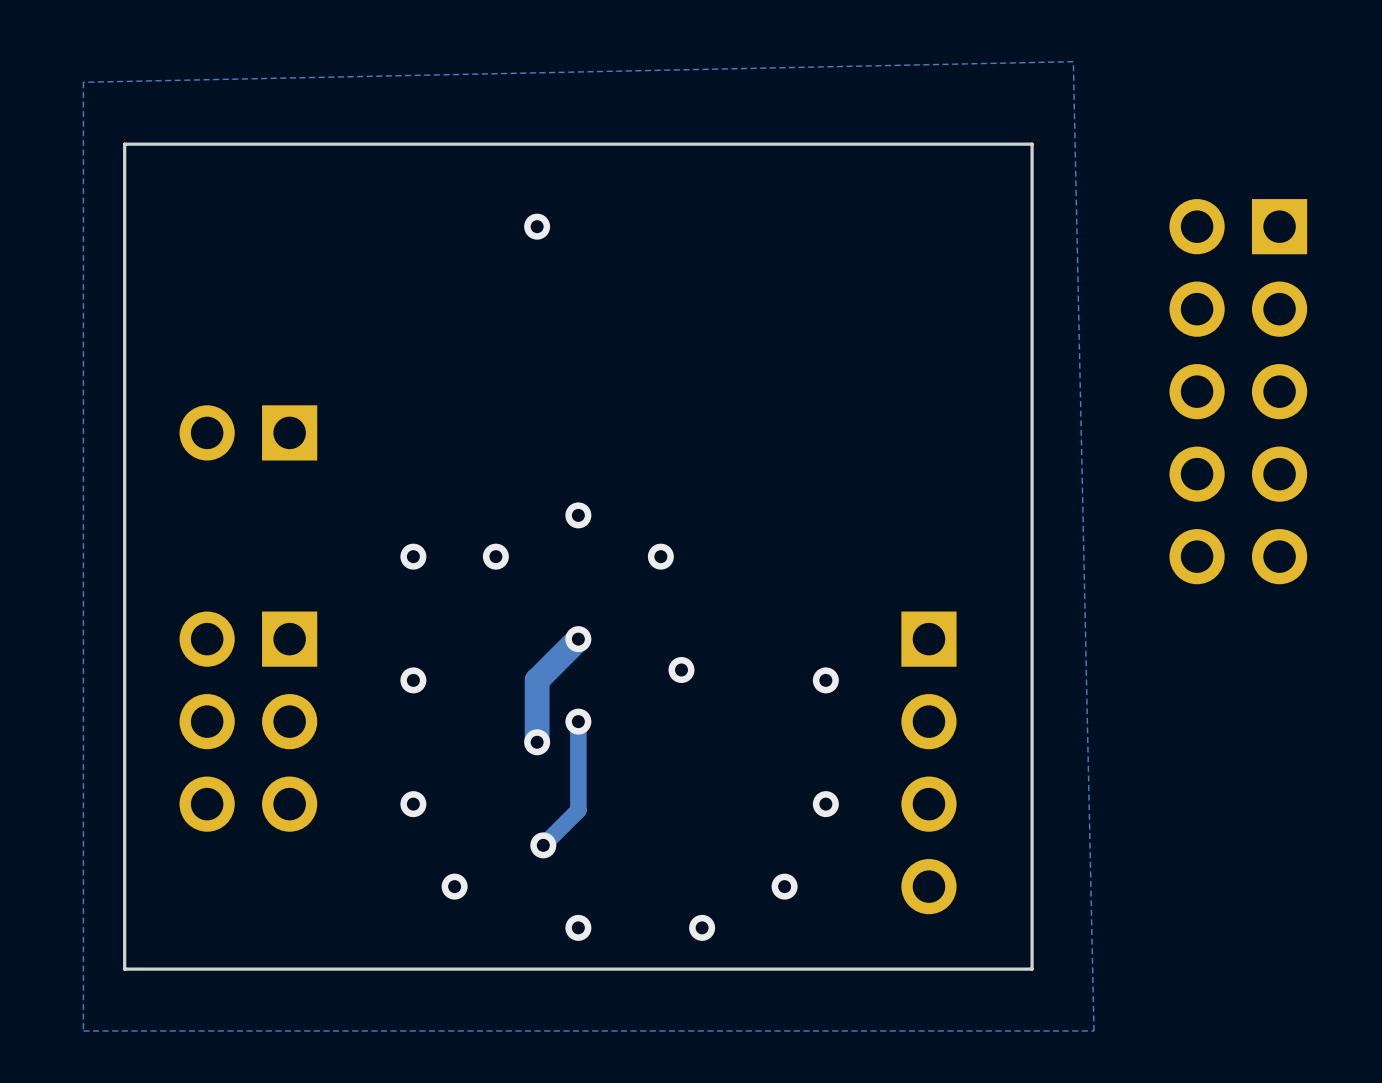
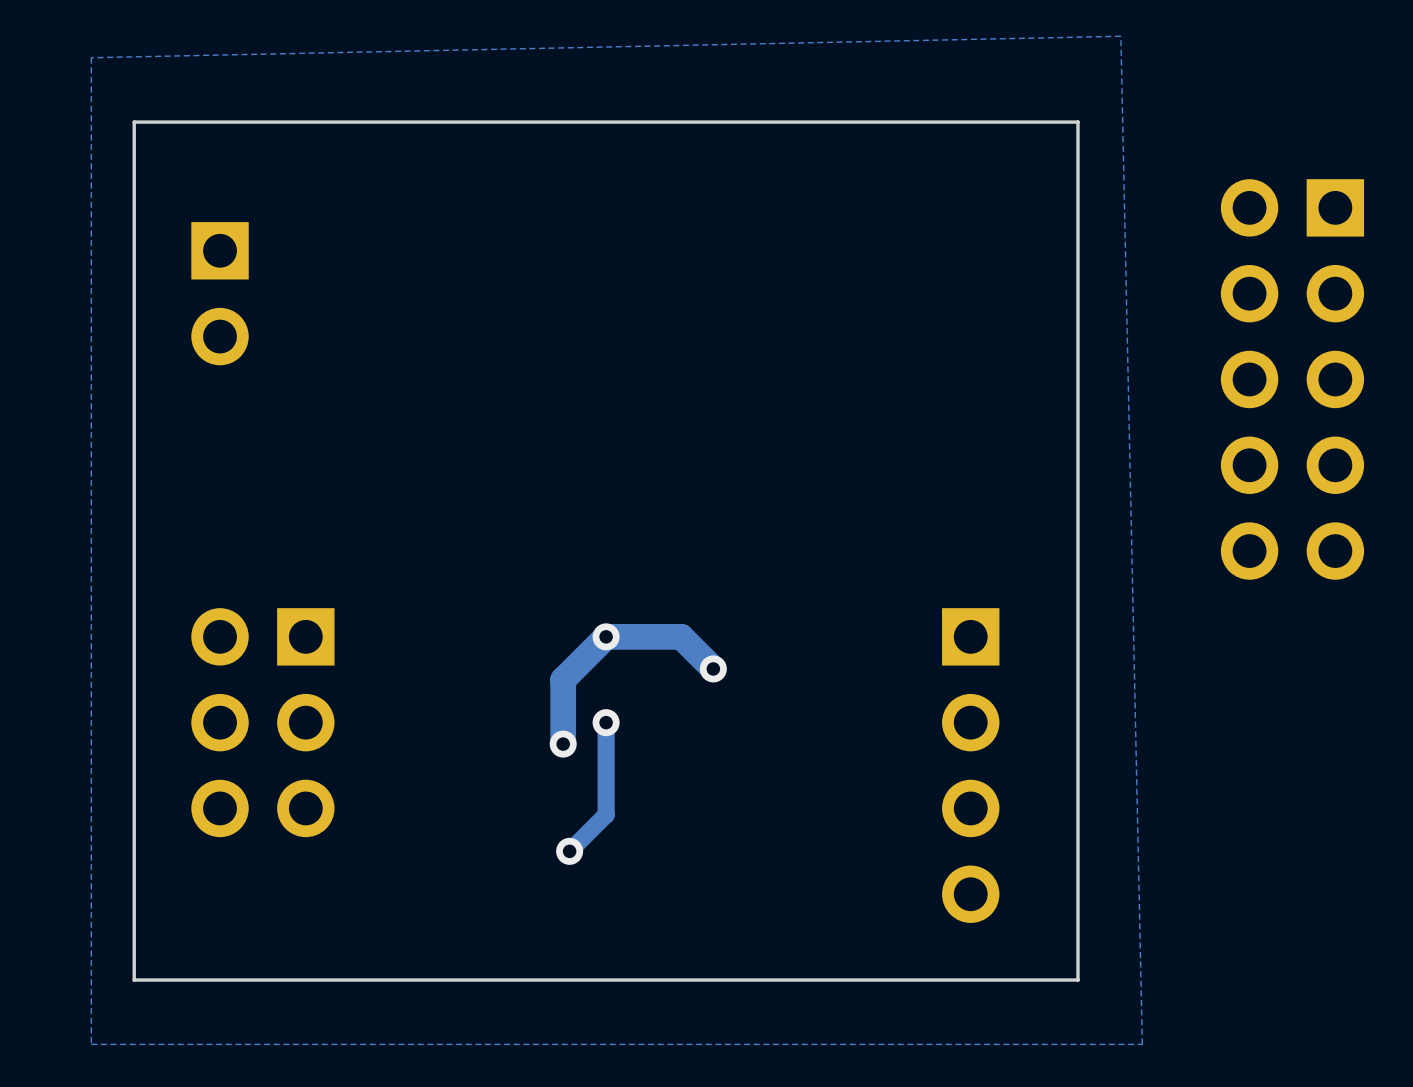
via: (537, 226) -> none
part rotation: 0° (248, 432) -> 90° counterclockwise (220, 293)
part position: (248, 432) -> (220, 293)
via: (578, 515) -> none
via: (413, 556) -> none
via: (495, 556) -> none
via: (660, 556) -> none
track: none -> (606, 636) (681, 636) (713, 668)
via: (413, 680) -> none
via: (825, 680) -> none
via: (413, 804) -> none
via: (825, 804) -> none
via: (454, 886) -> none
via: (784, 886) -> none
via: (578, 927) -> none
via: (702, 927) -> none

